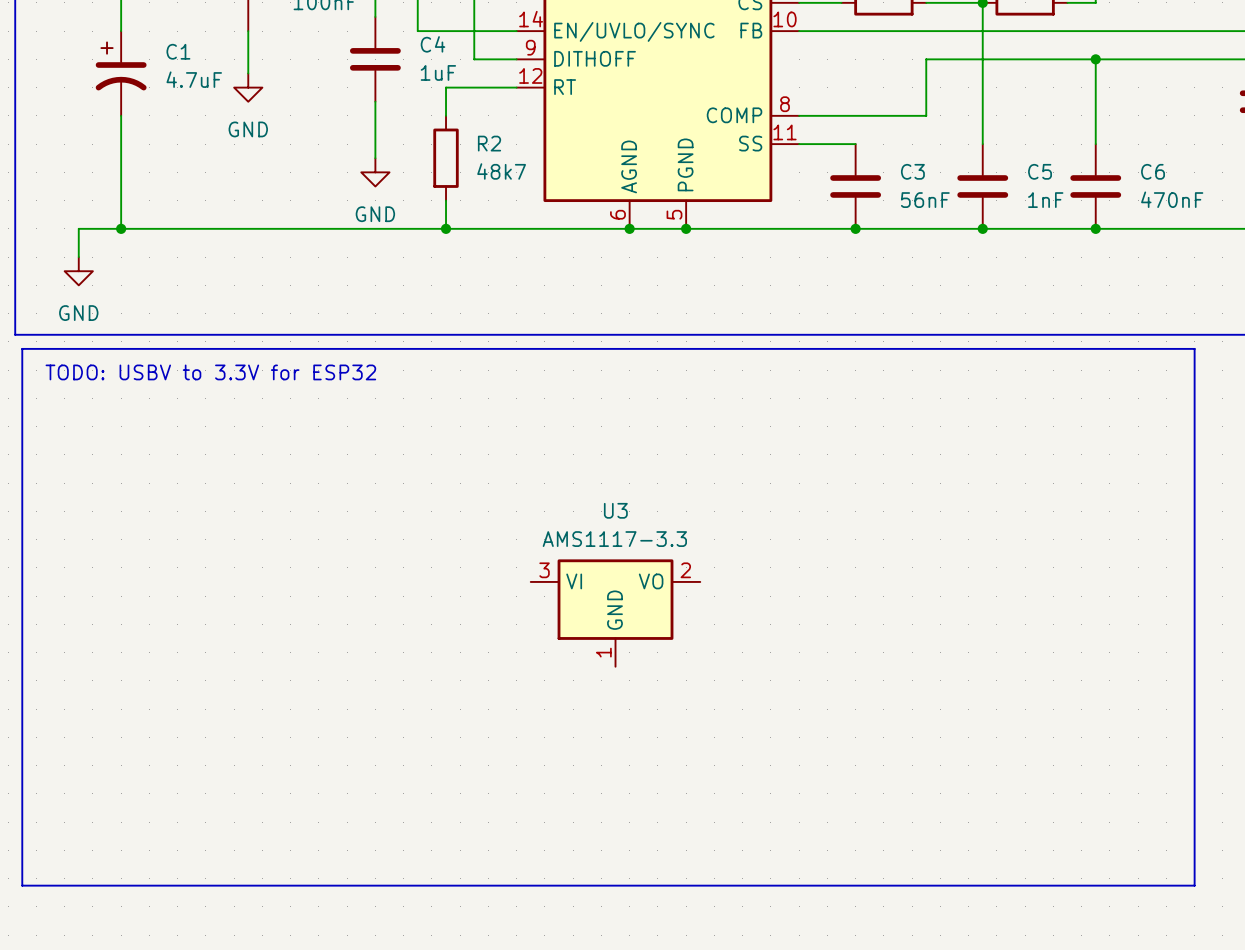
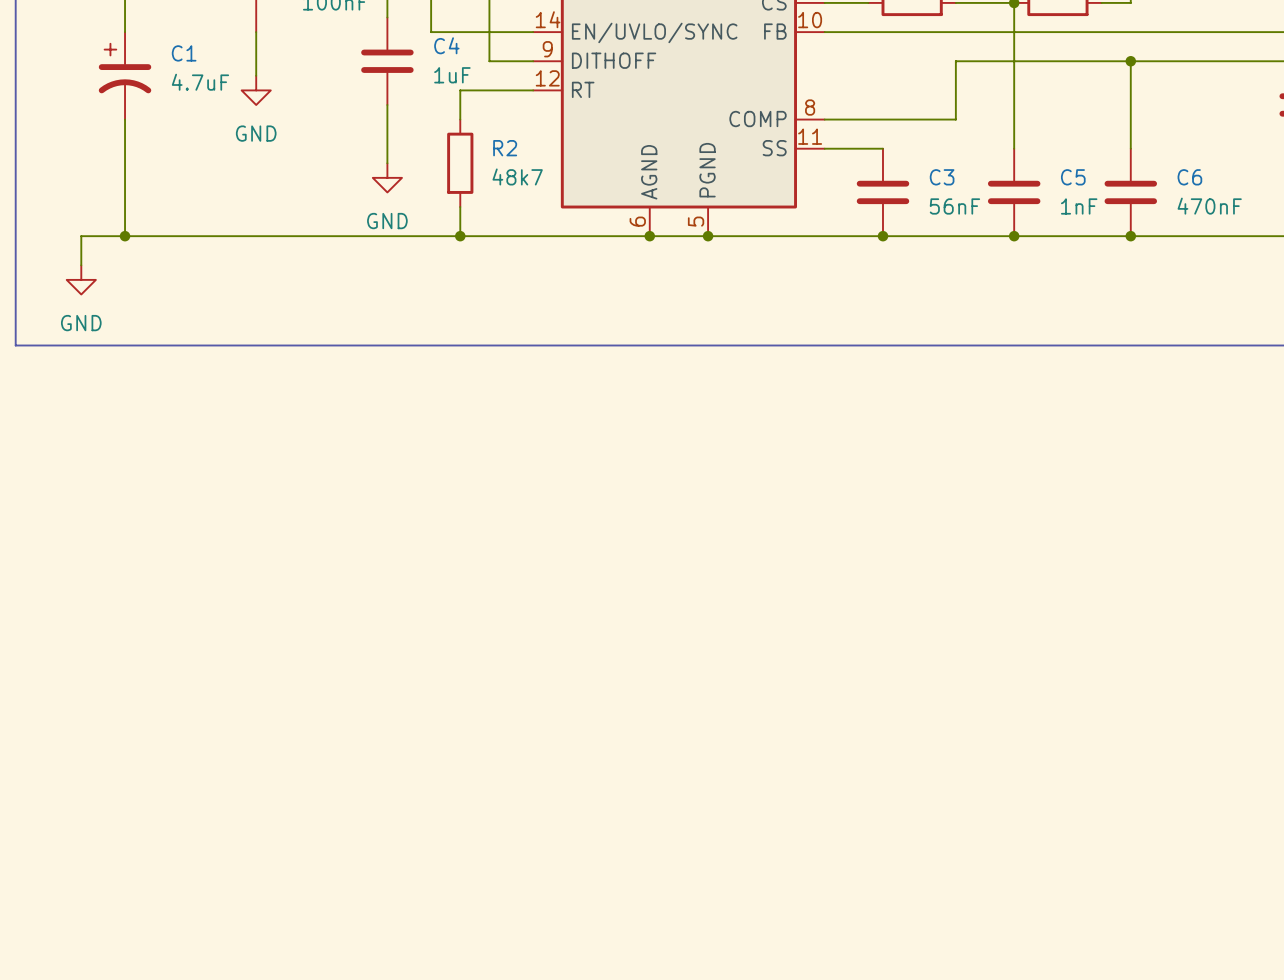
line: (22, 348) (1194, 348) (1194, 885) (22, 885) (22, 348) -> none
text: TODO: USBV to 3.3V for ESP32 (210, 372) -> none
U3: AMS1117-3.3 (615, 613) -> none

